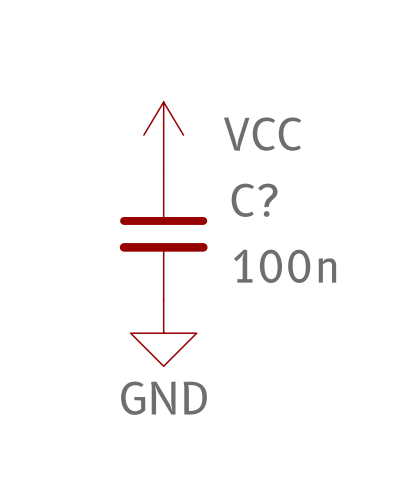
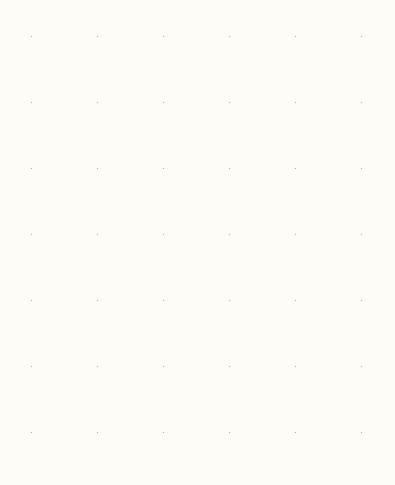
power symbol: VCC (163, 135) -> none
C?: 100n (163, 234) -> none
power symbol: GND (163, 333) -> none

